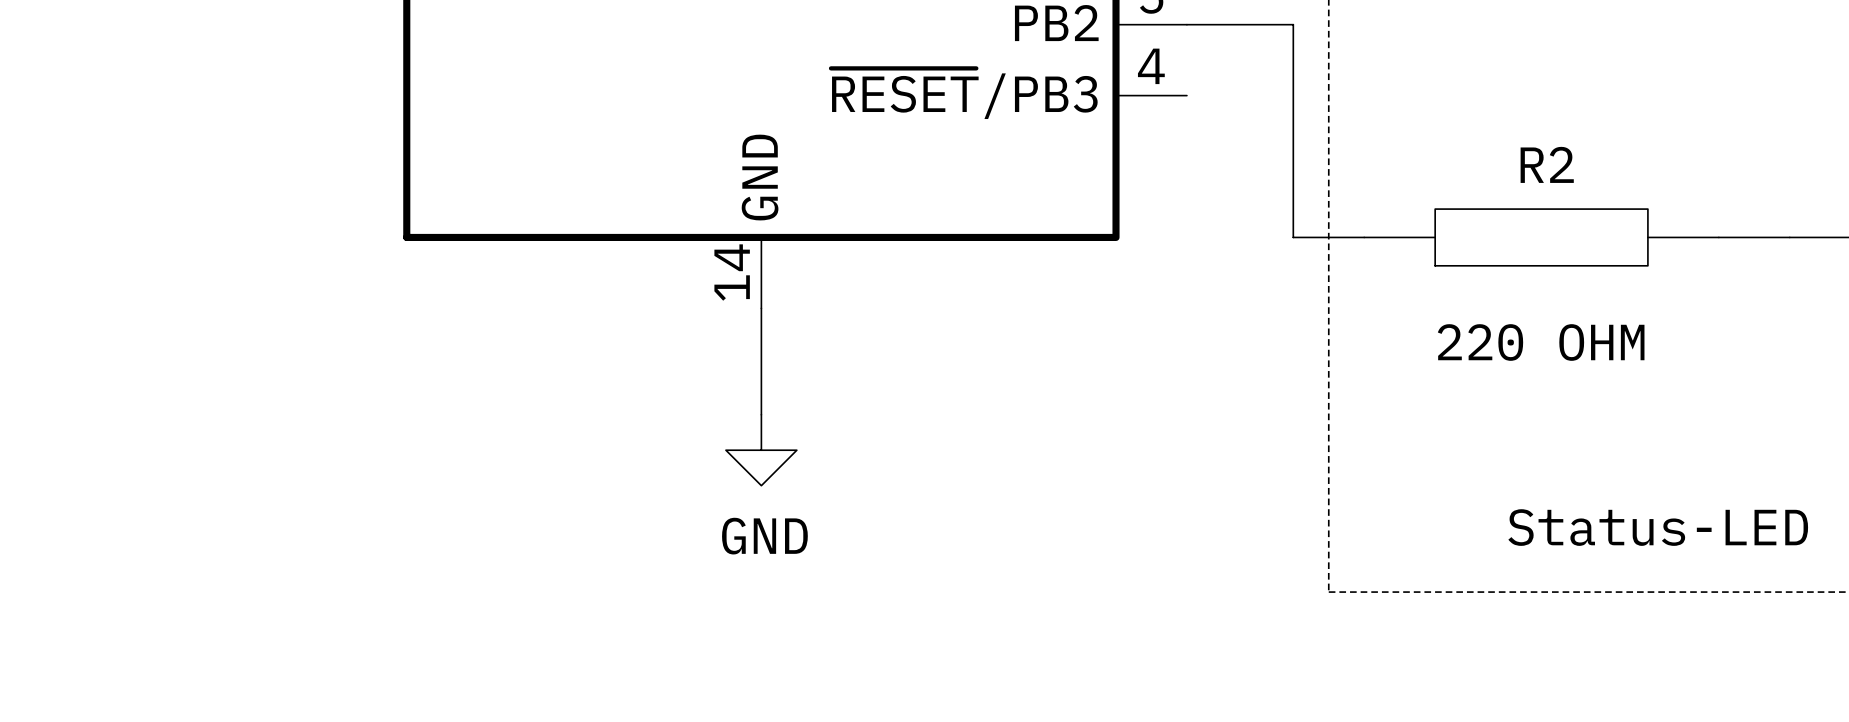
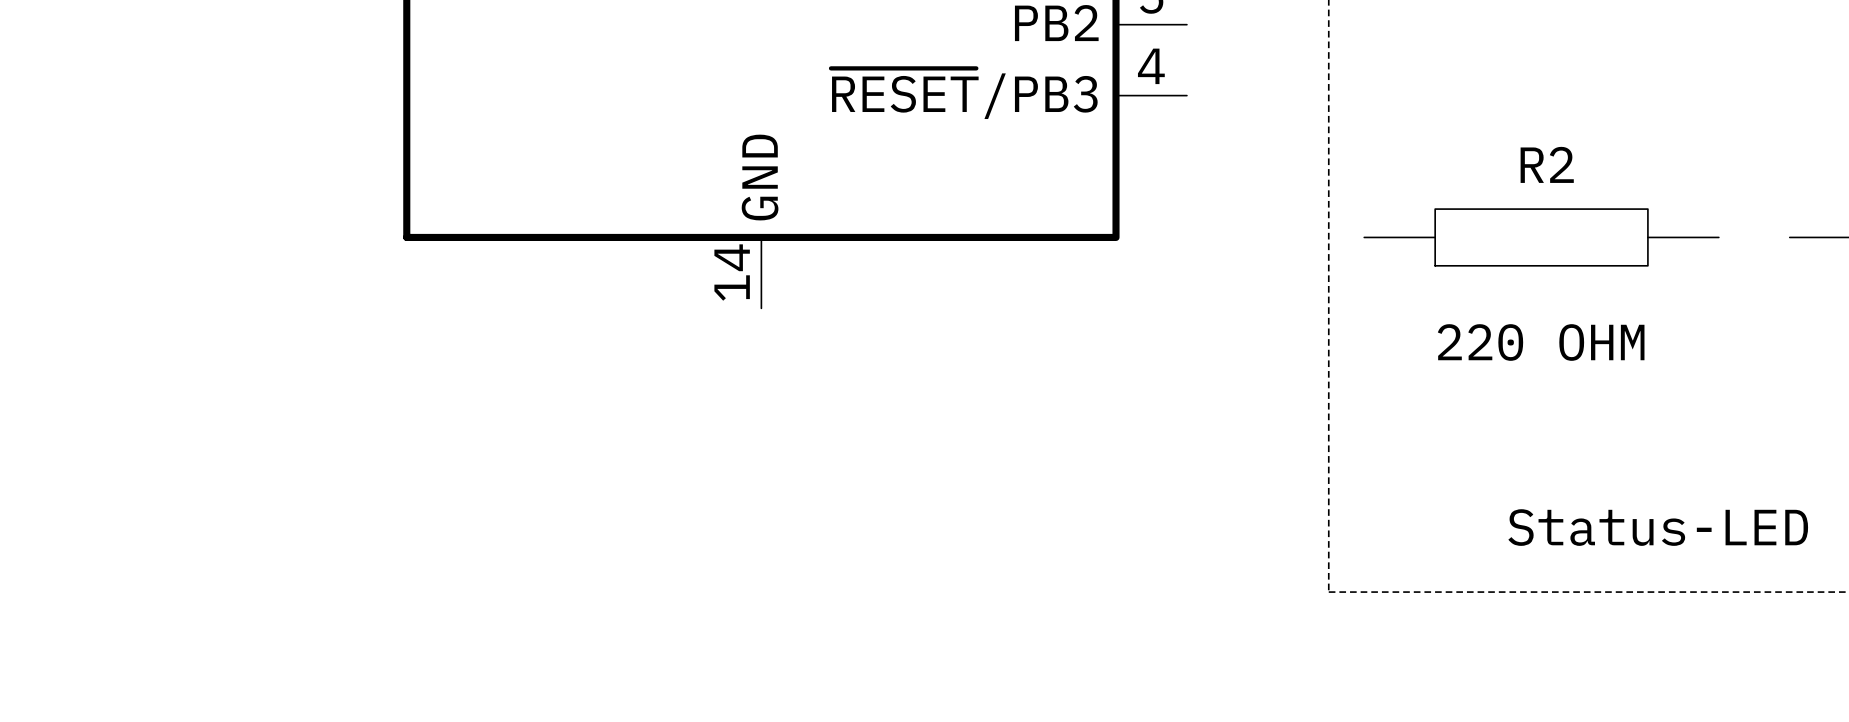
wire: (1186, 24) (1293, 24) (1293, 237) (1364, 237) -> none
wire: (1718, 237) (1789, 237) -> none
wire: (761, 308) (761, 414) -> none
power symbol: GND (761, 450) -> none

